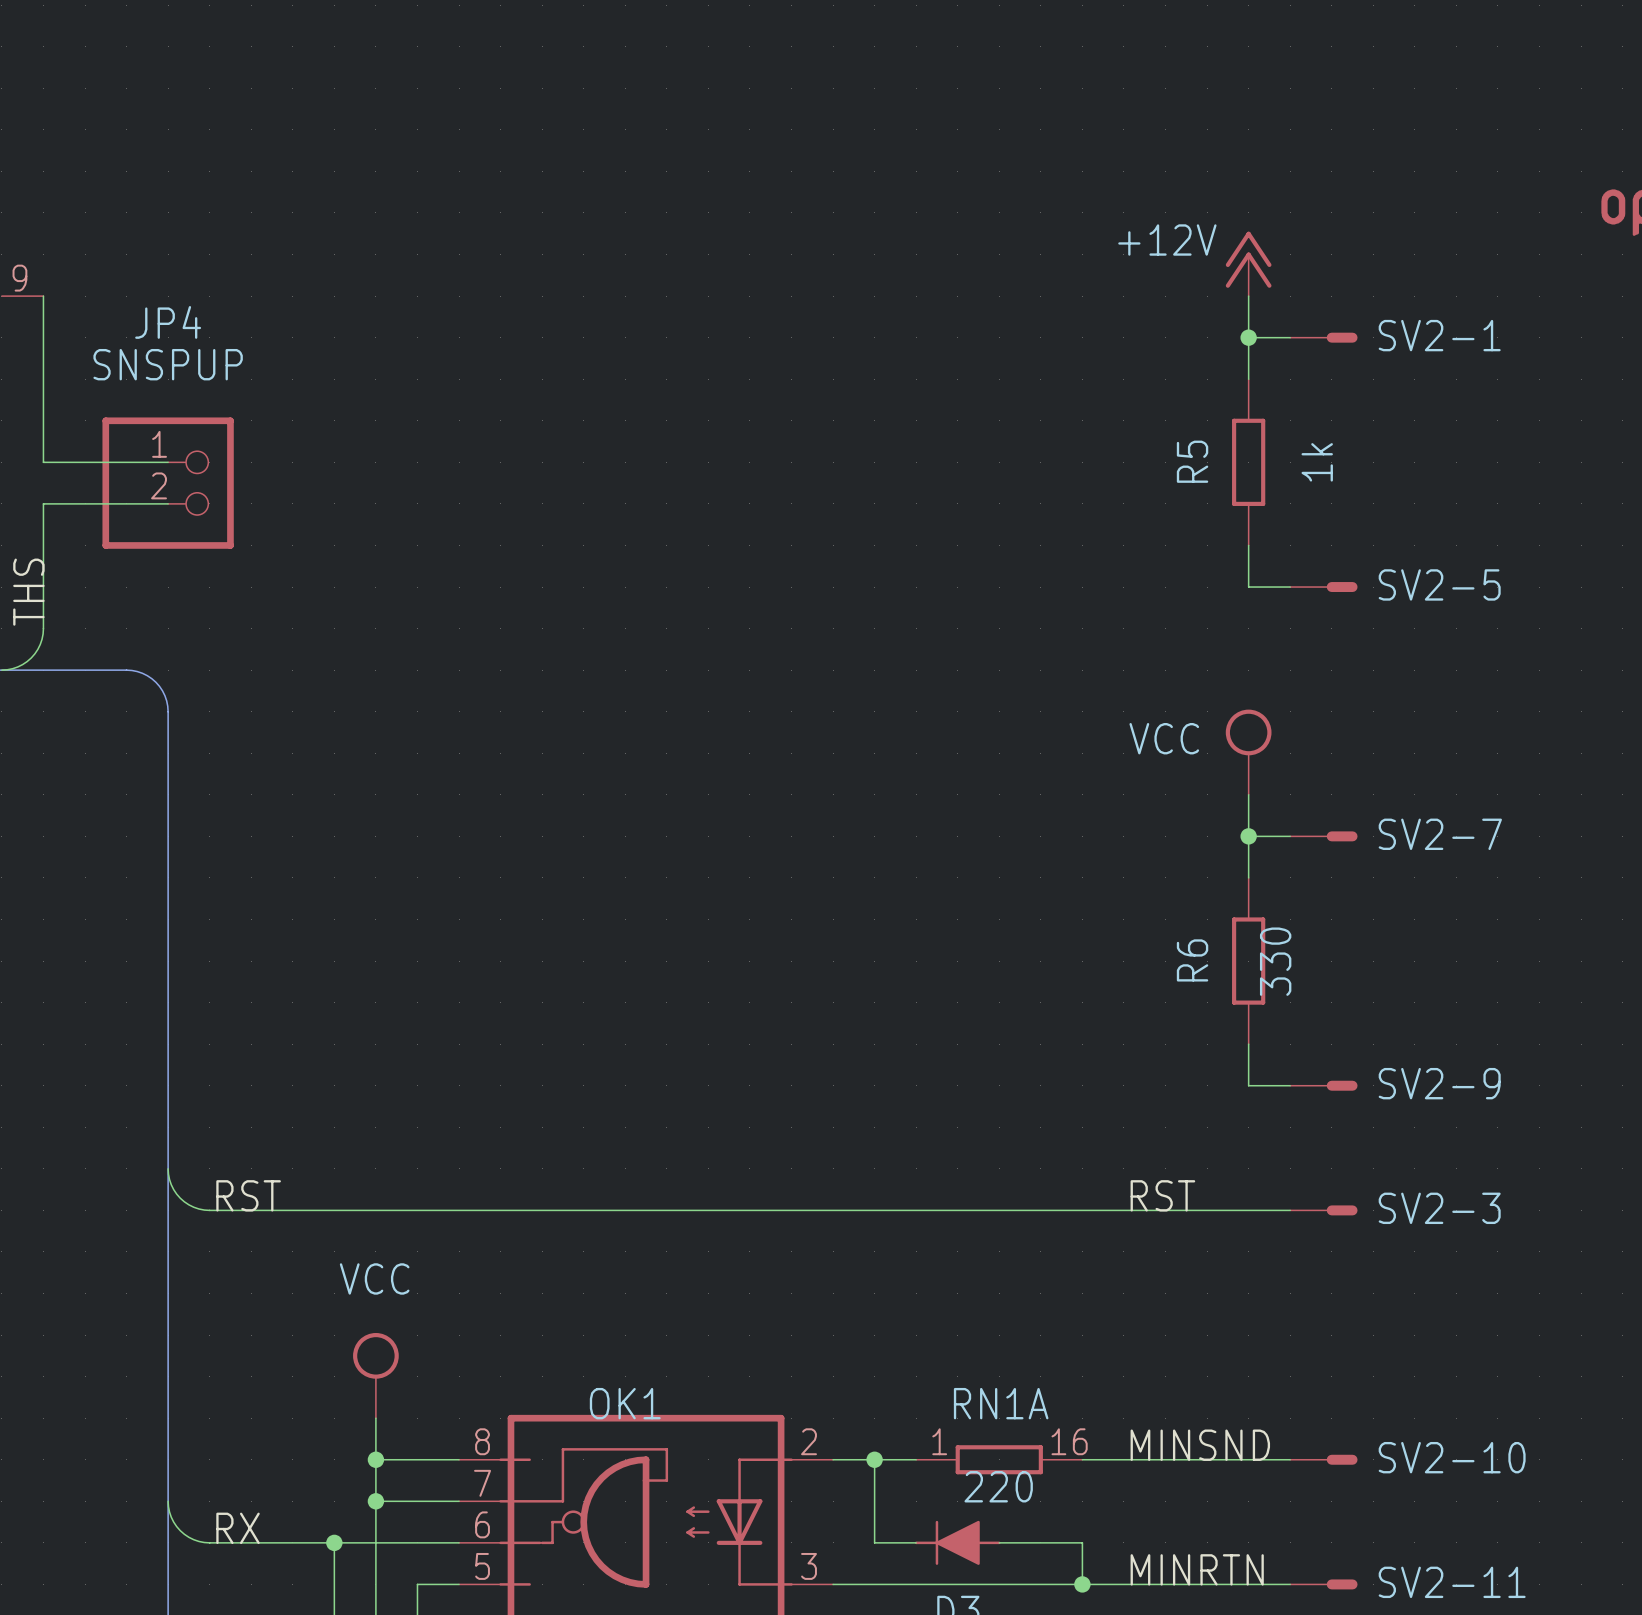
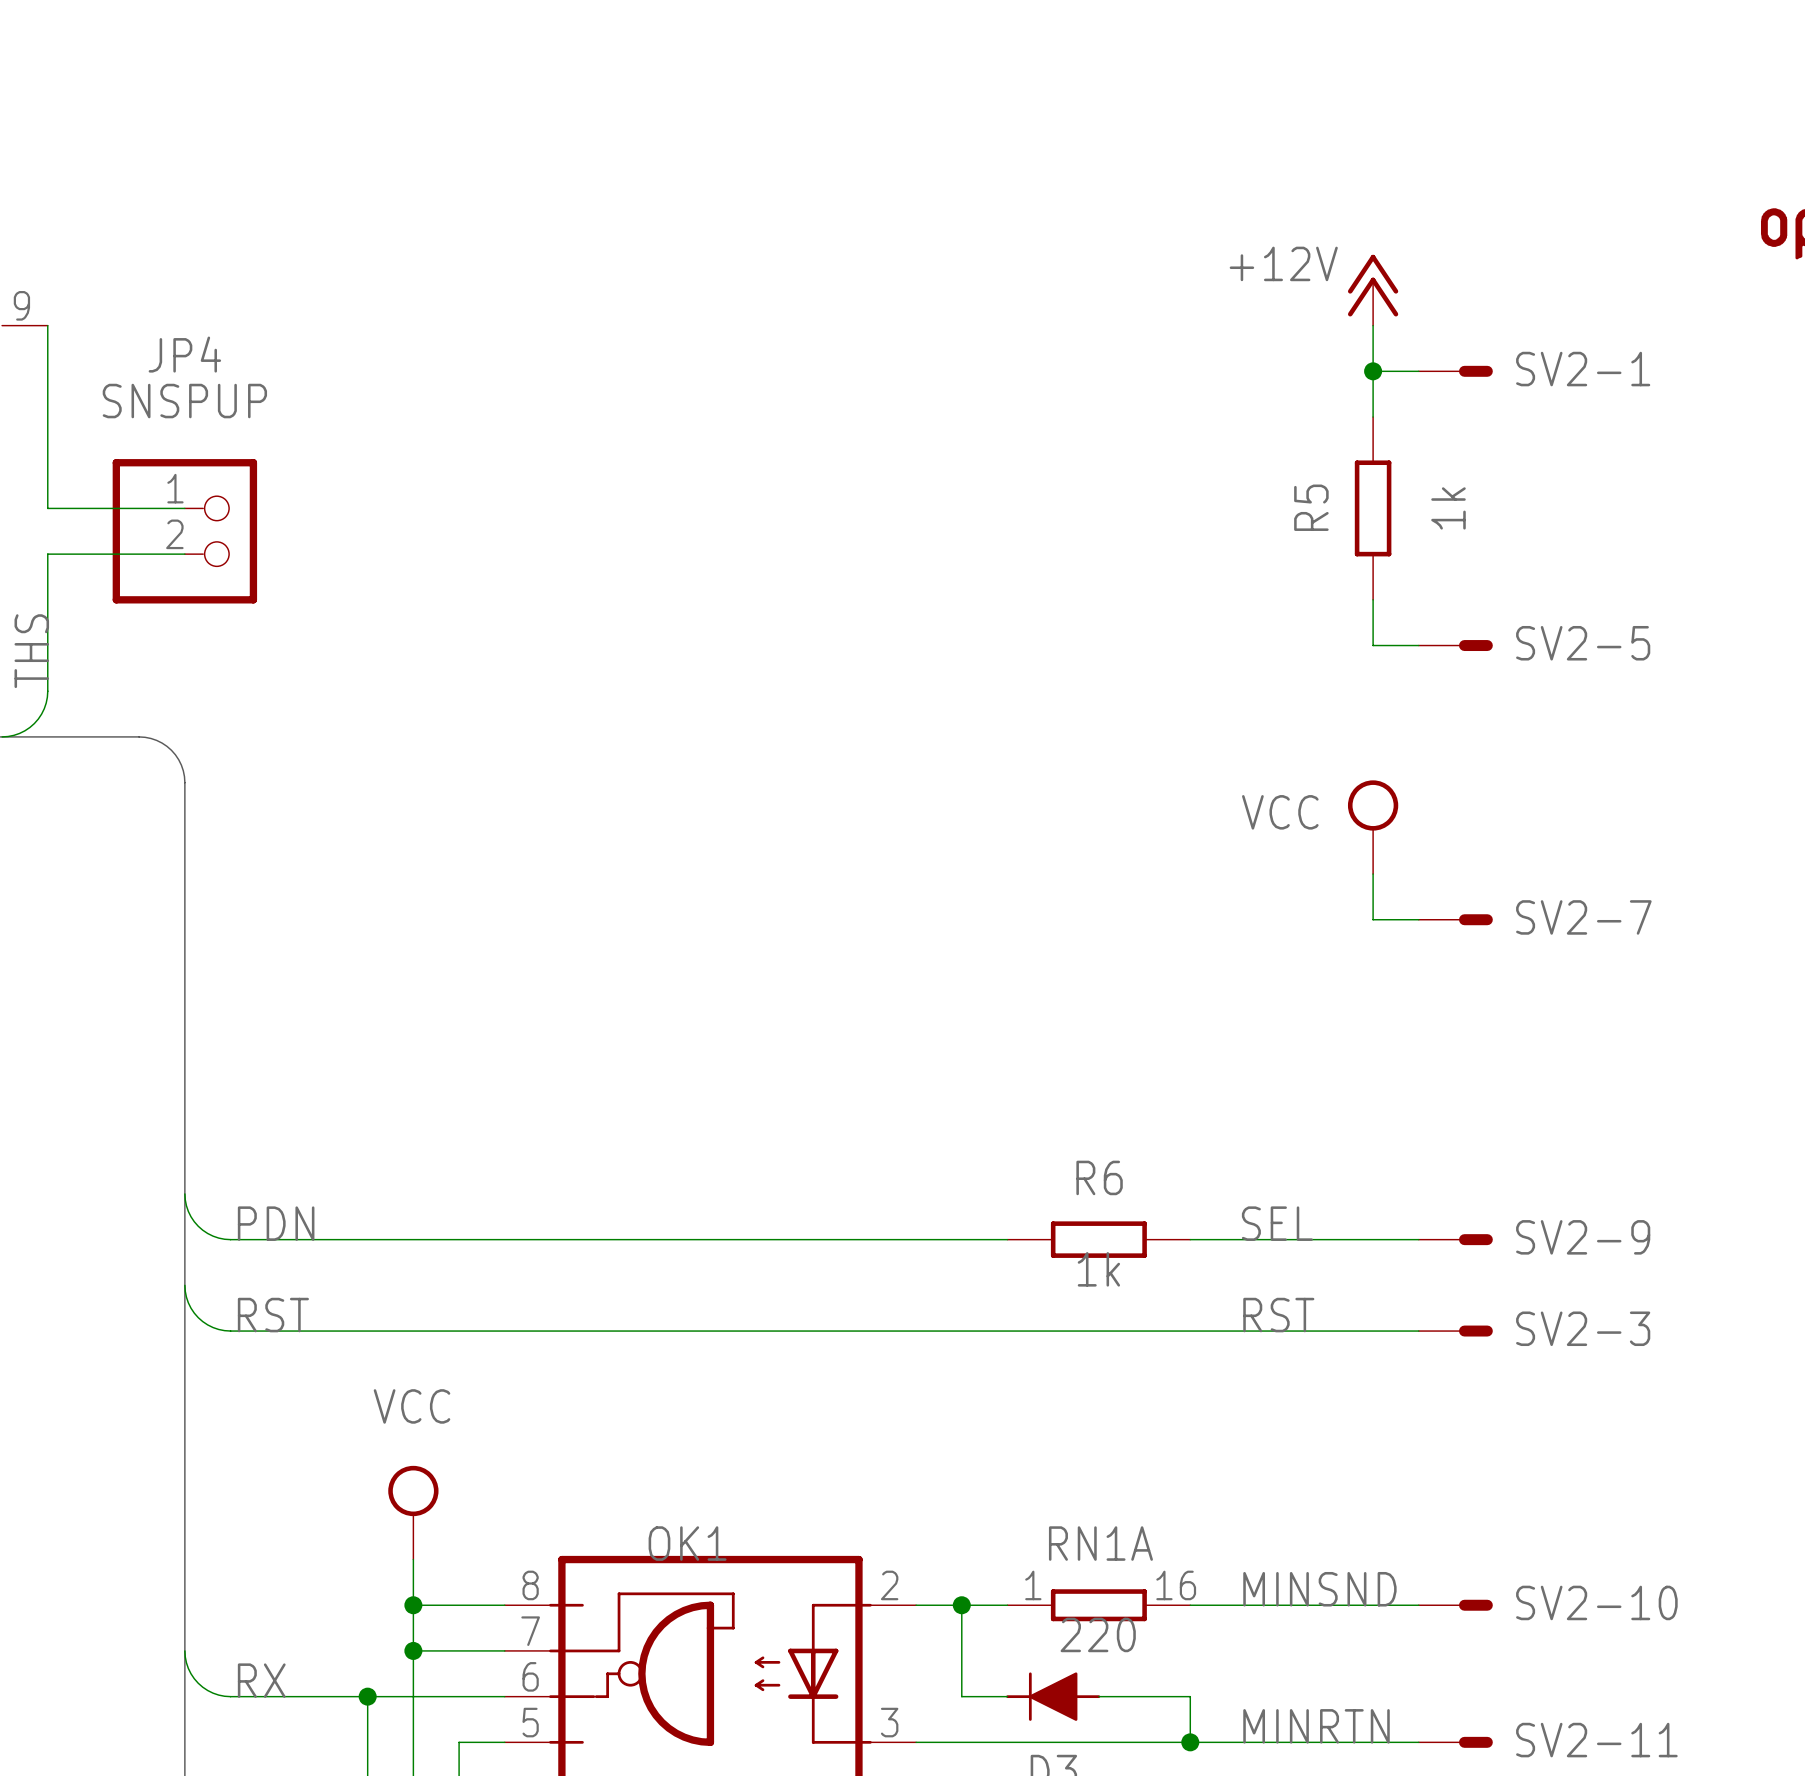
wire: (1248, 836) (1248, 877) -> none
junction: (1248, 836) -> none
R6 rotation: 0° (1248, 961) -> 90° clockwise (1098, 1239)
R6 position: (1248, 961) -> (1098, 1239)
R6 value: 330 (1275, 961) -> 1k (1098, 1269)
wire: (1248, 1044) (1248, 1085) (1290, 1085) -> none
wire: none -> (184, 1193) (188, 1211) (198, 1226) (213, 1236) (230, 1239) (1007, 1239)
SV2-9 position: (1323, 1085) -> (1455, 1239)
label: none -> PDN (276, 1223)
label: none -> SEL (1277, 1223)
wire: none -> (1190, 1239) (1418, 1239)

